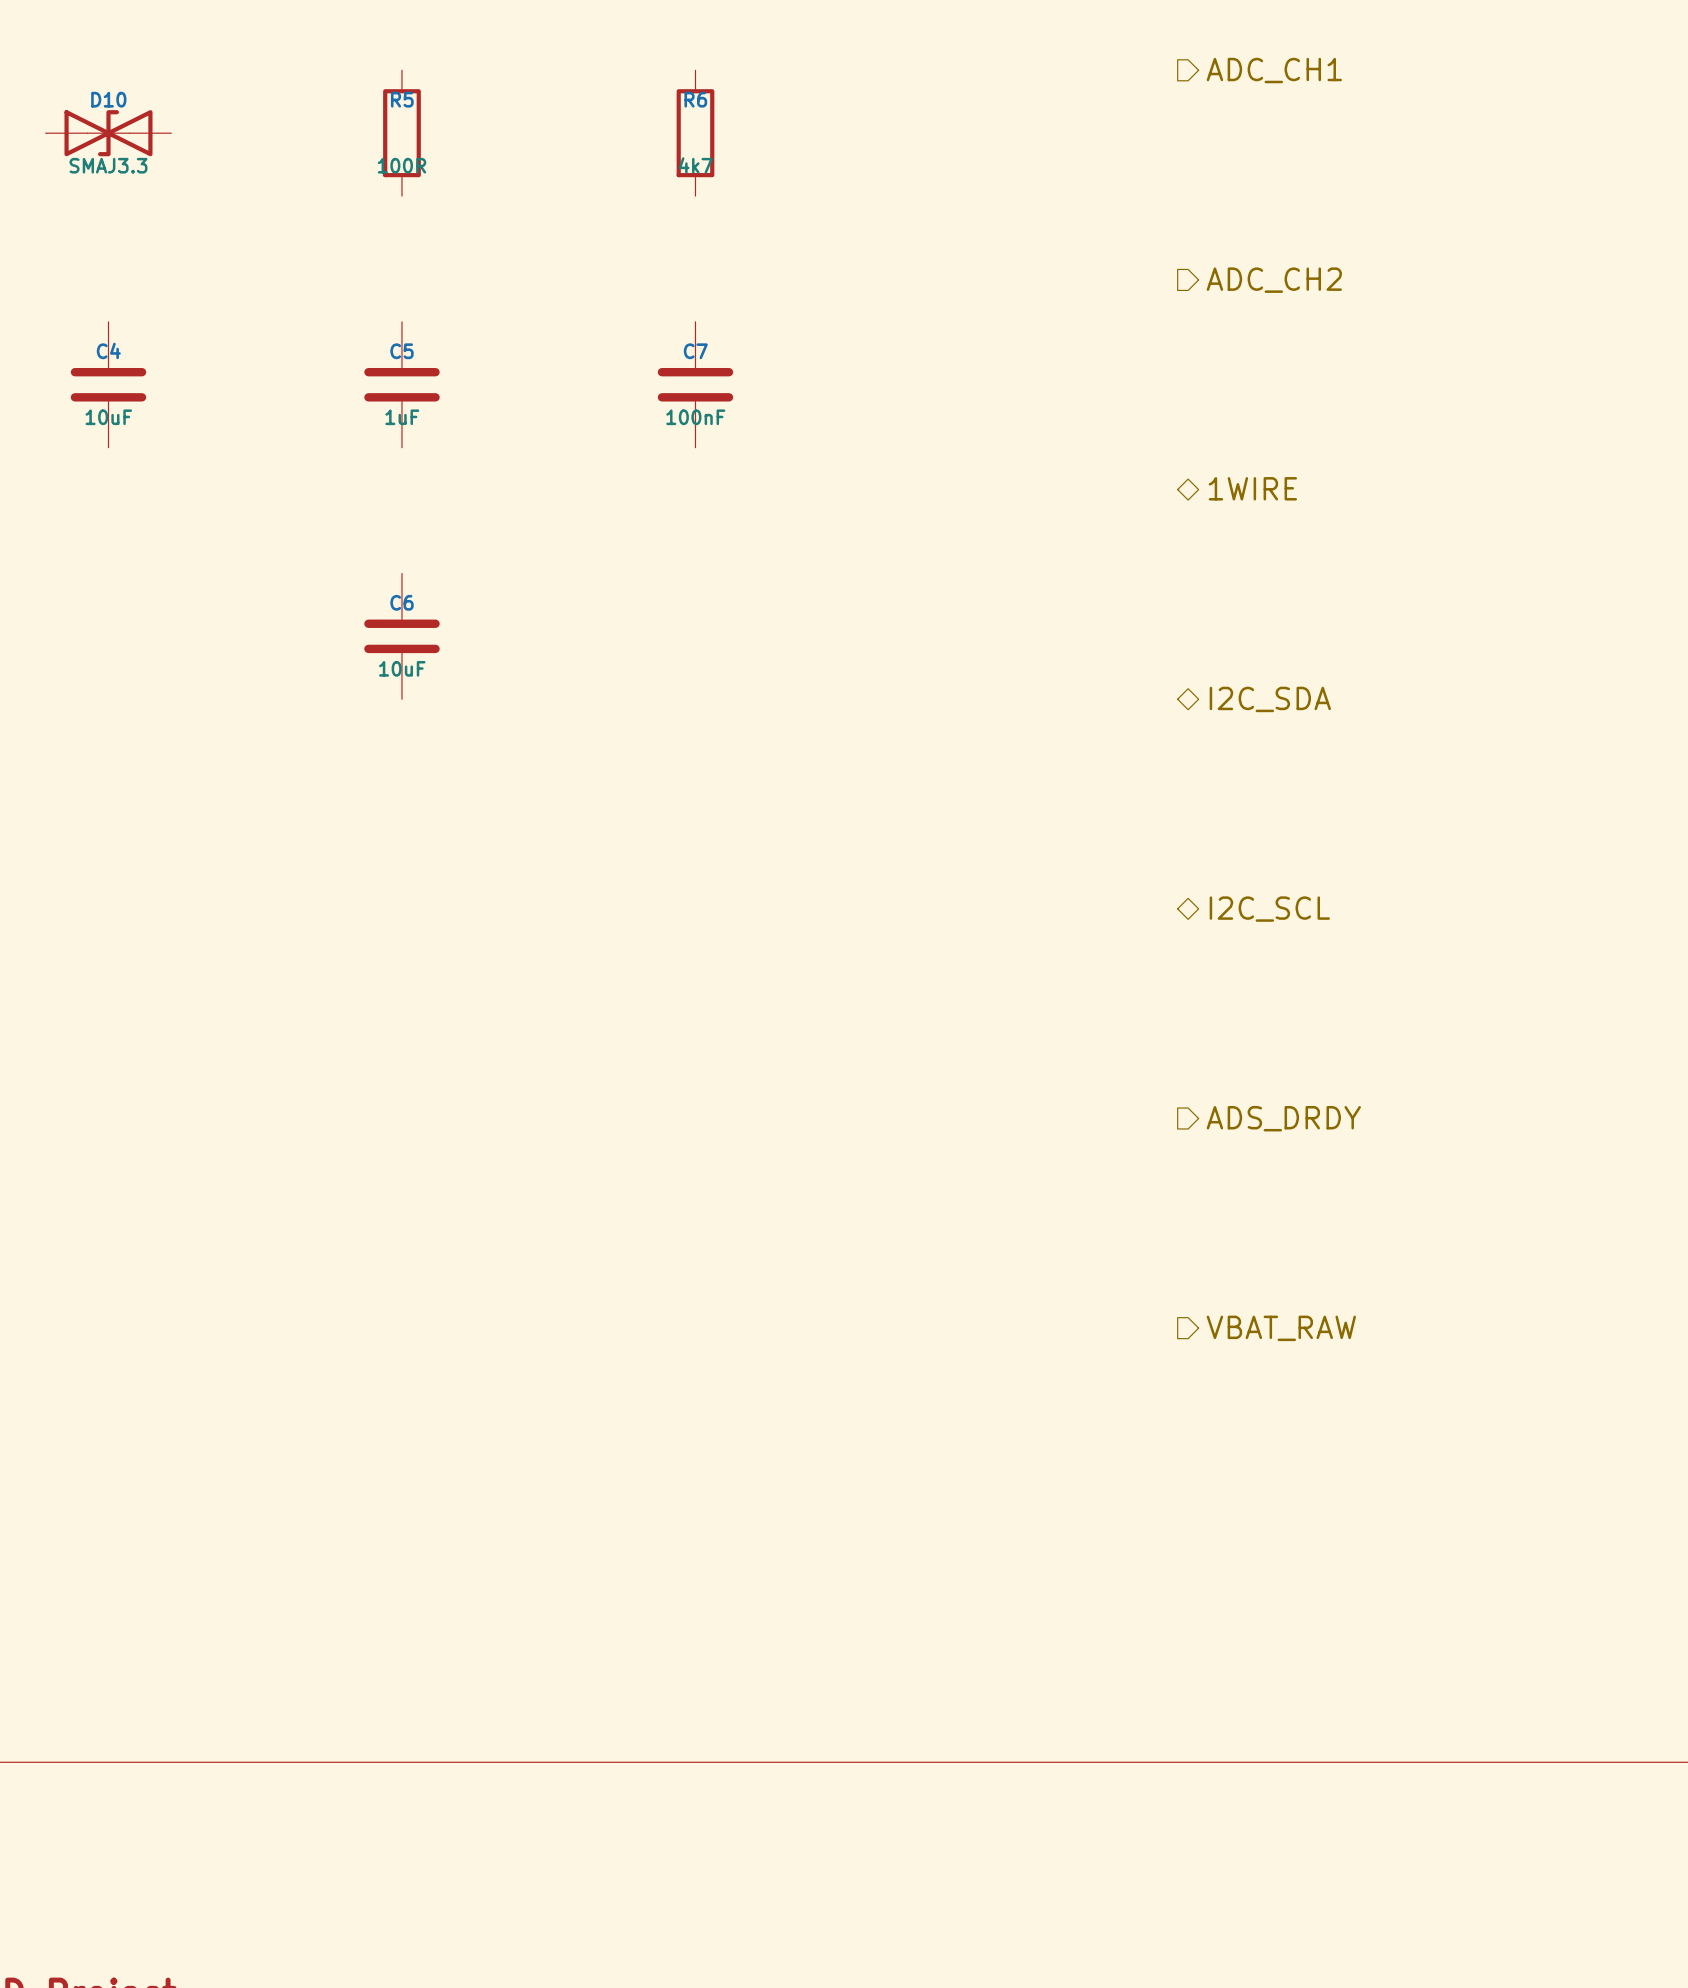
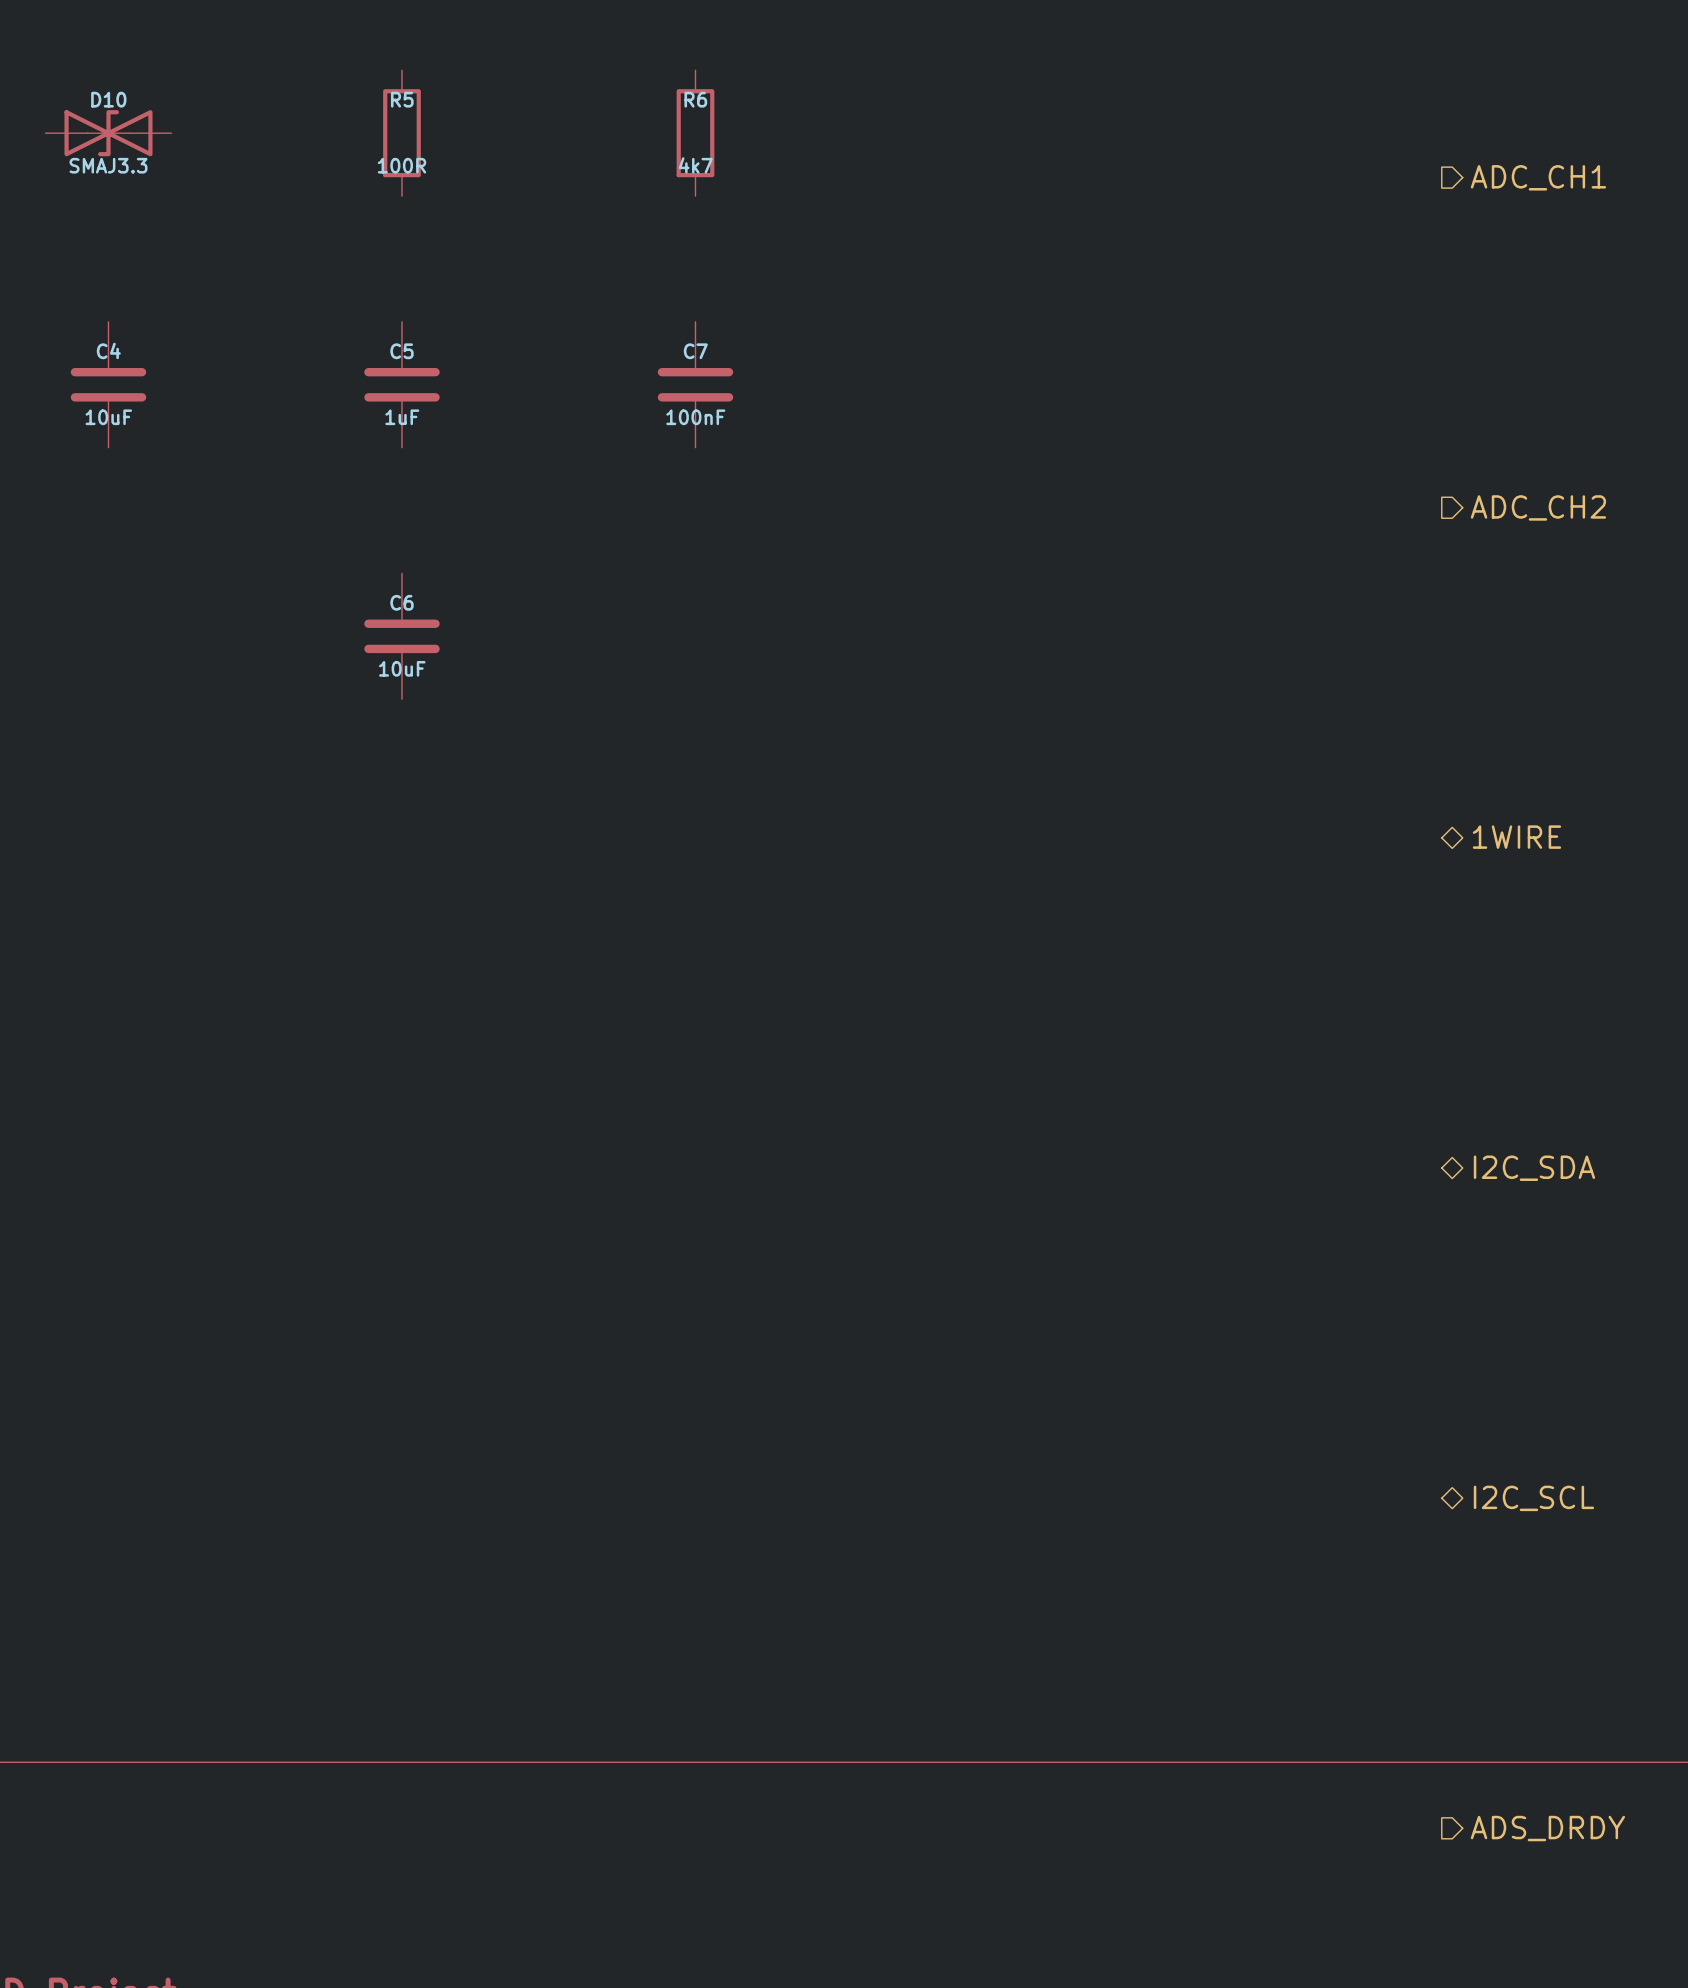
hierarchical label position: ADC_CH1 (1274, 70) -> ADC_CH1 (1538, 177)
hierarchical label position: ADC_CH2 (1274, 280) -> ADC_CH2 (1538, 507)
hierarchical label: 1WIRE (1252, 488) -> none
hierarchical label: I2C_SDA (1270, 699) -> none
hierarchical label: none -> 1WIRE (1516, 837)
hierarchical label: I2C_SCL (1269, 909) -> none
hierarchical label: ADS_DRDY (1283, 1118) -> none
hierarchical label: none -> I2C_SDA (1534, 1168)
hierarchical label: VBAT_RAW (1281, 1328) -> none
hierarchical label: none -> I2C_SCL (1533, 1498)
hierarchical label: none -> ADS_DRDY (1547, 1828)

